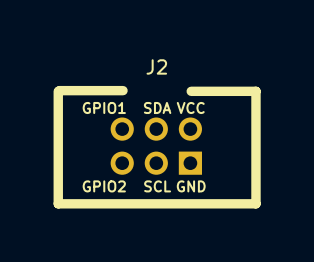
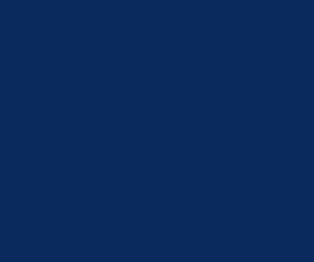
J2: (157, 147) -> none

